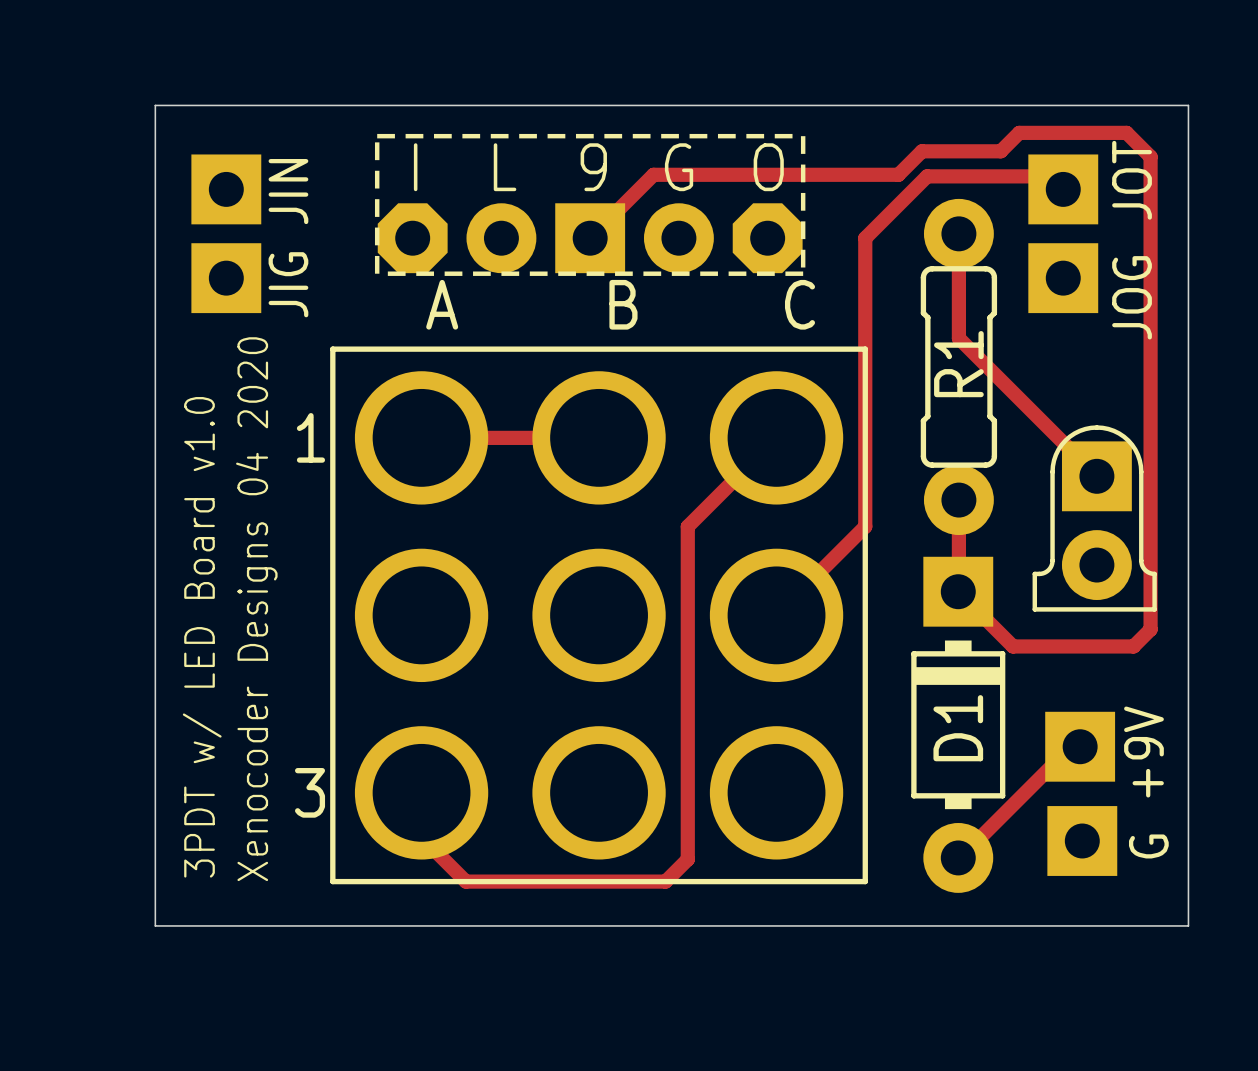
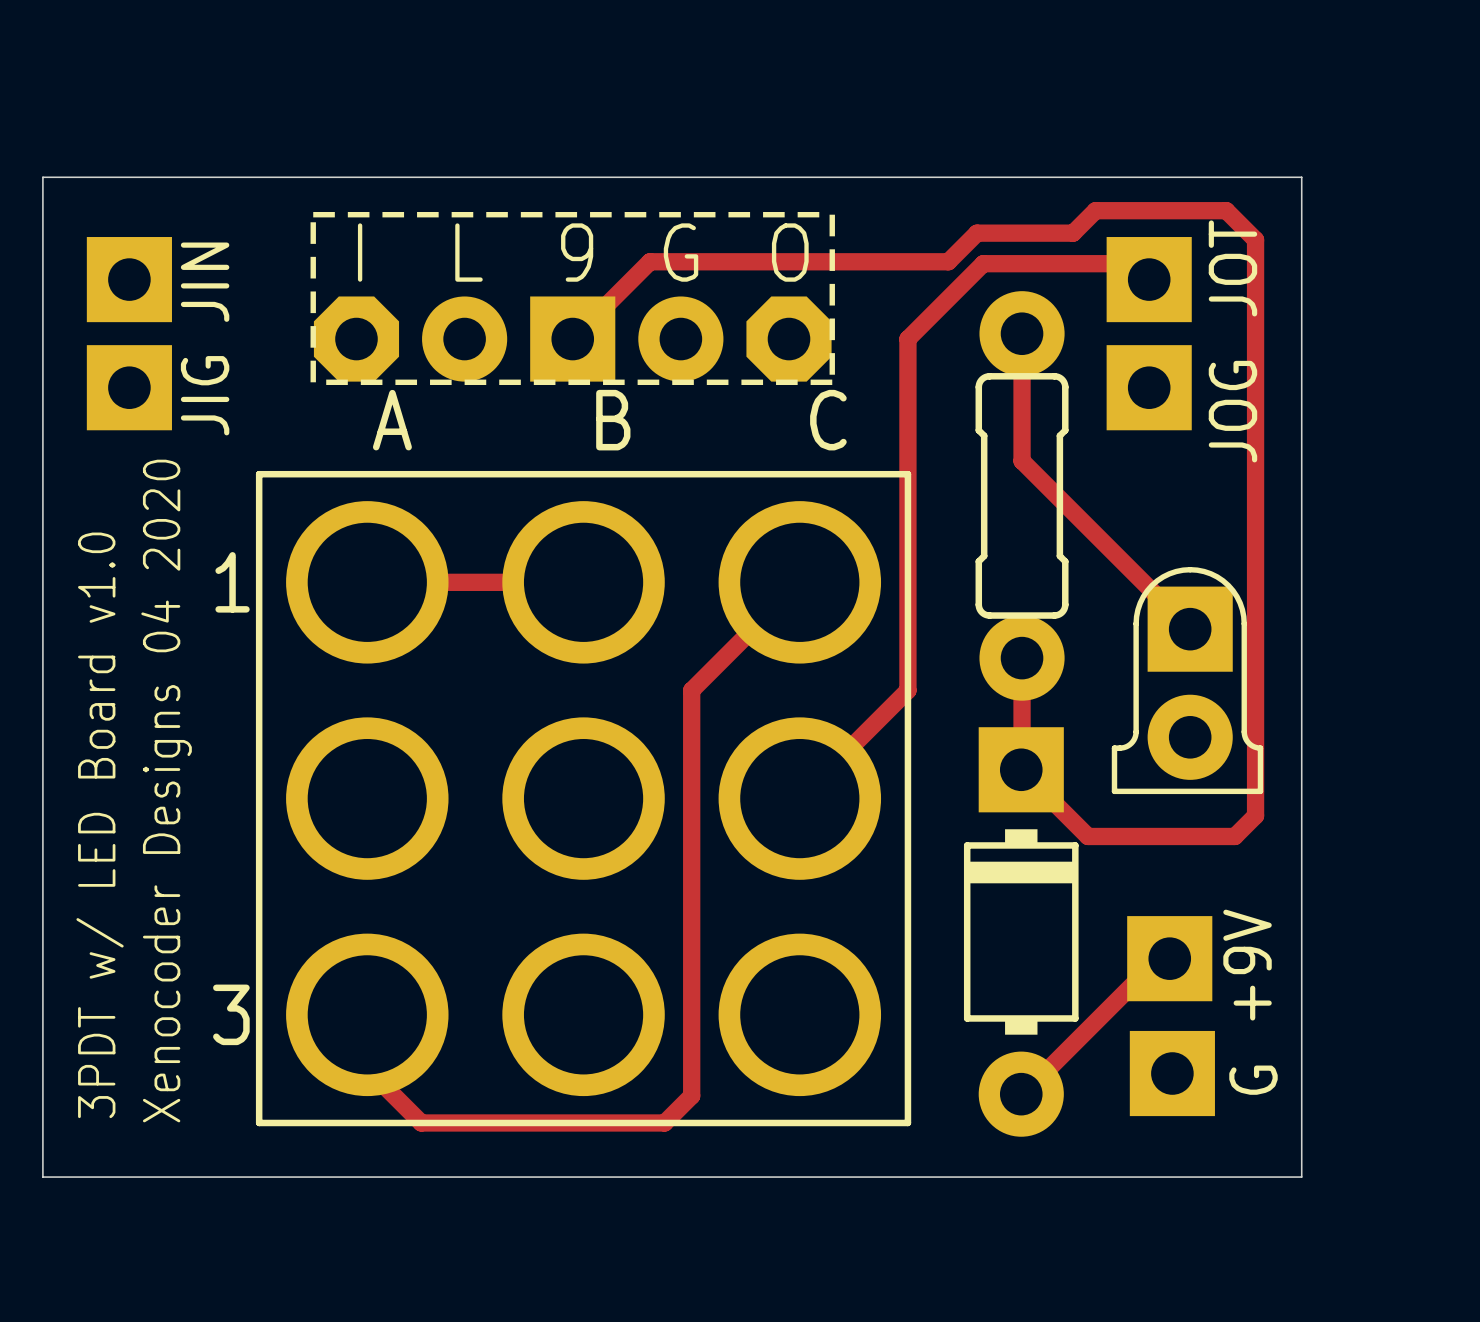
R1 name: R1 (958, 364) -> none
D1 name: D1 (958, 728) -> none

